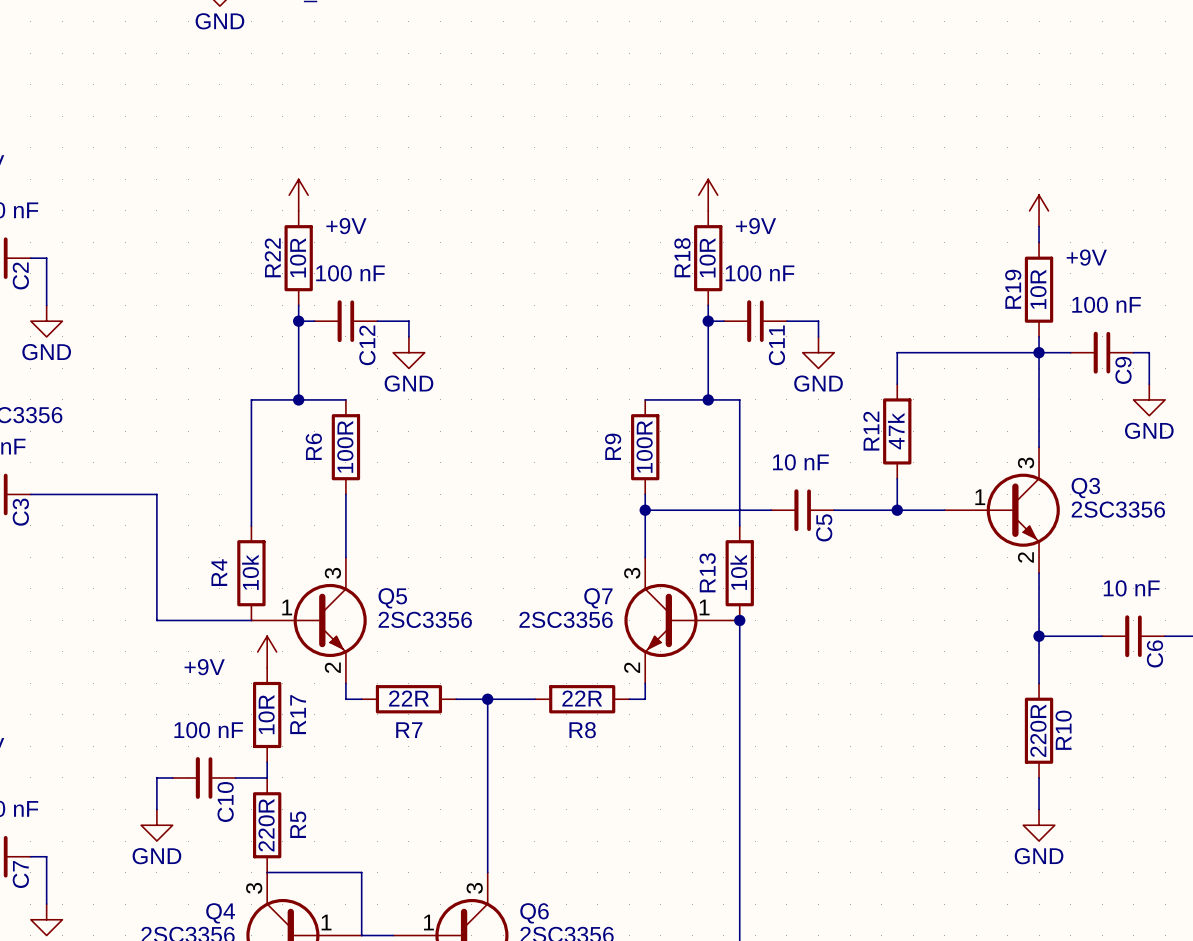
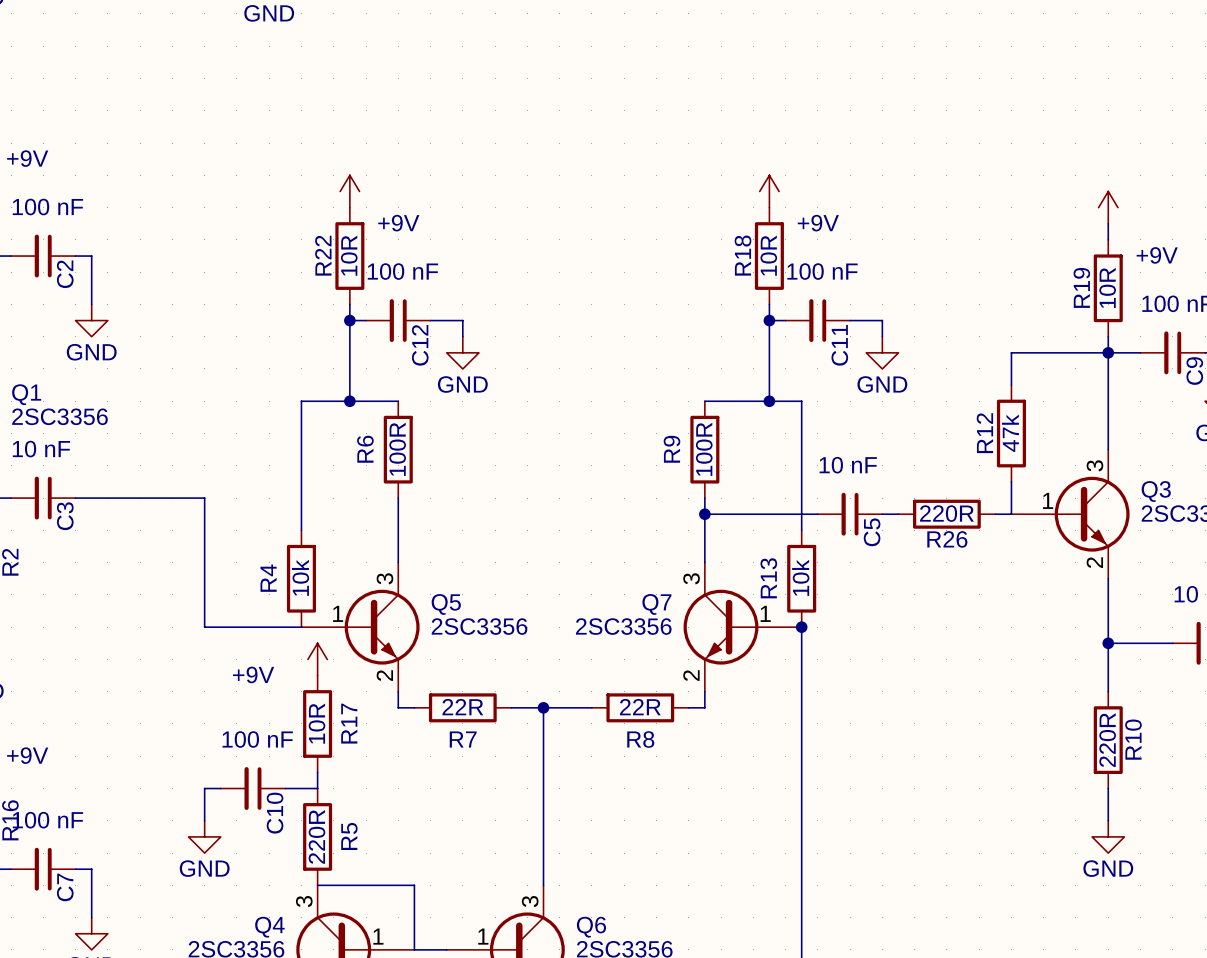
wire: (944, 352) (897, 352) (897, 384) -> (1011, 352) (1011, 385)
R12 position: (897, 431) -> (1011, 433)
wire: (897, 478) (897, 510) -> (1011, 481) (1011, 514)
C5 position: (802, 510) -> (850, 514)
R26: none -> 220R (946, 514)
junction: (897, 510) -> none

